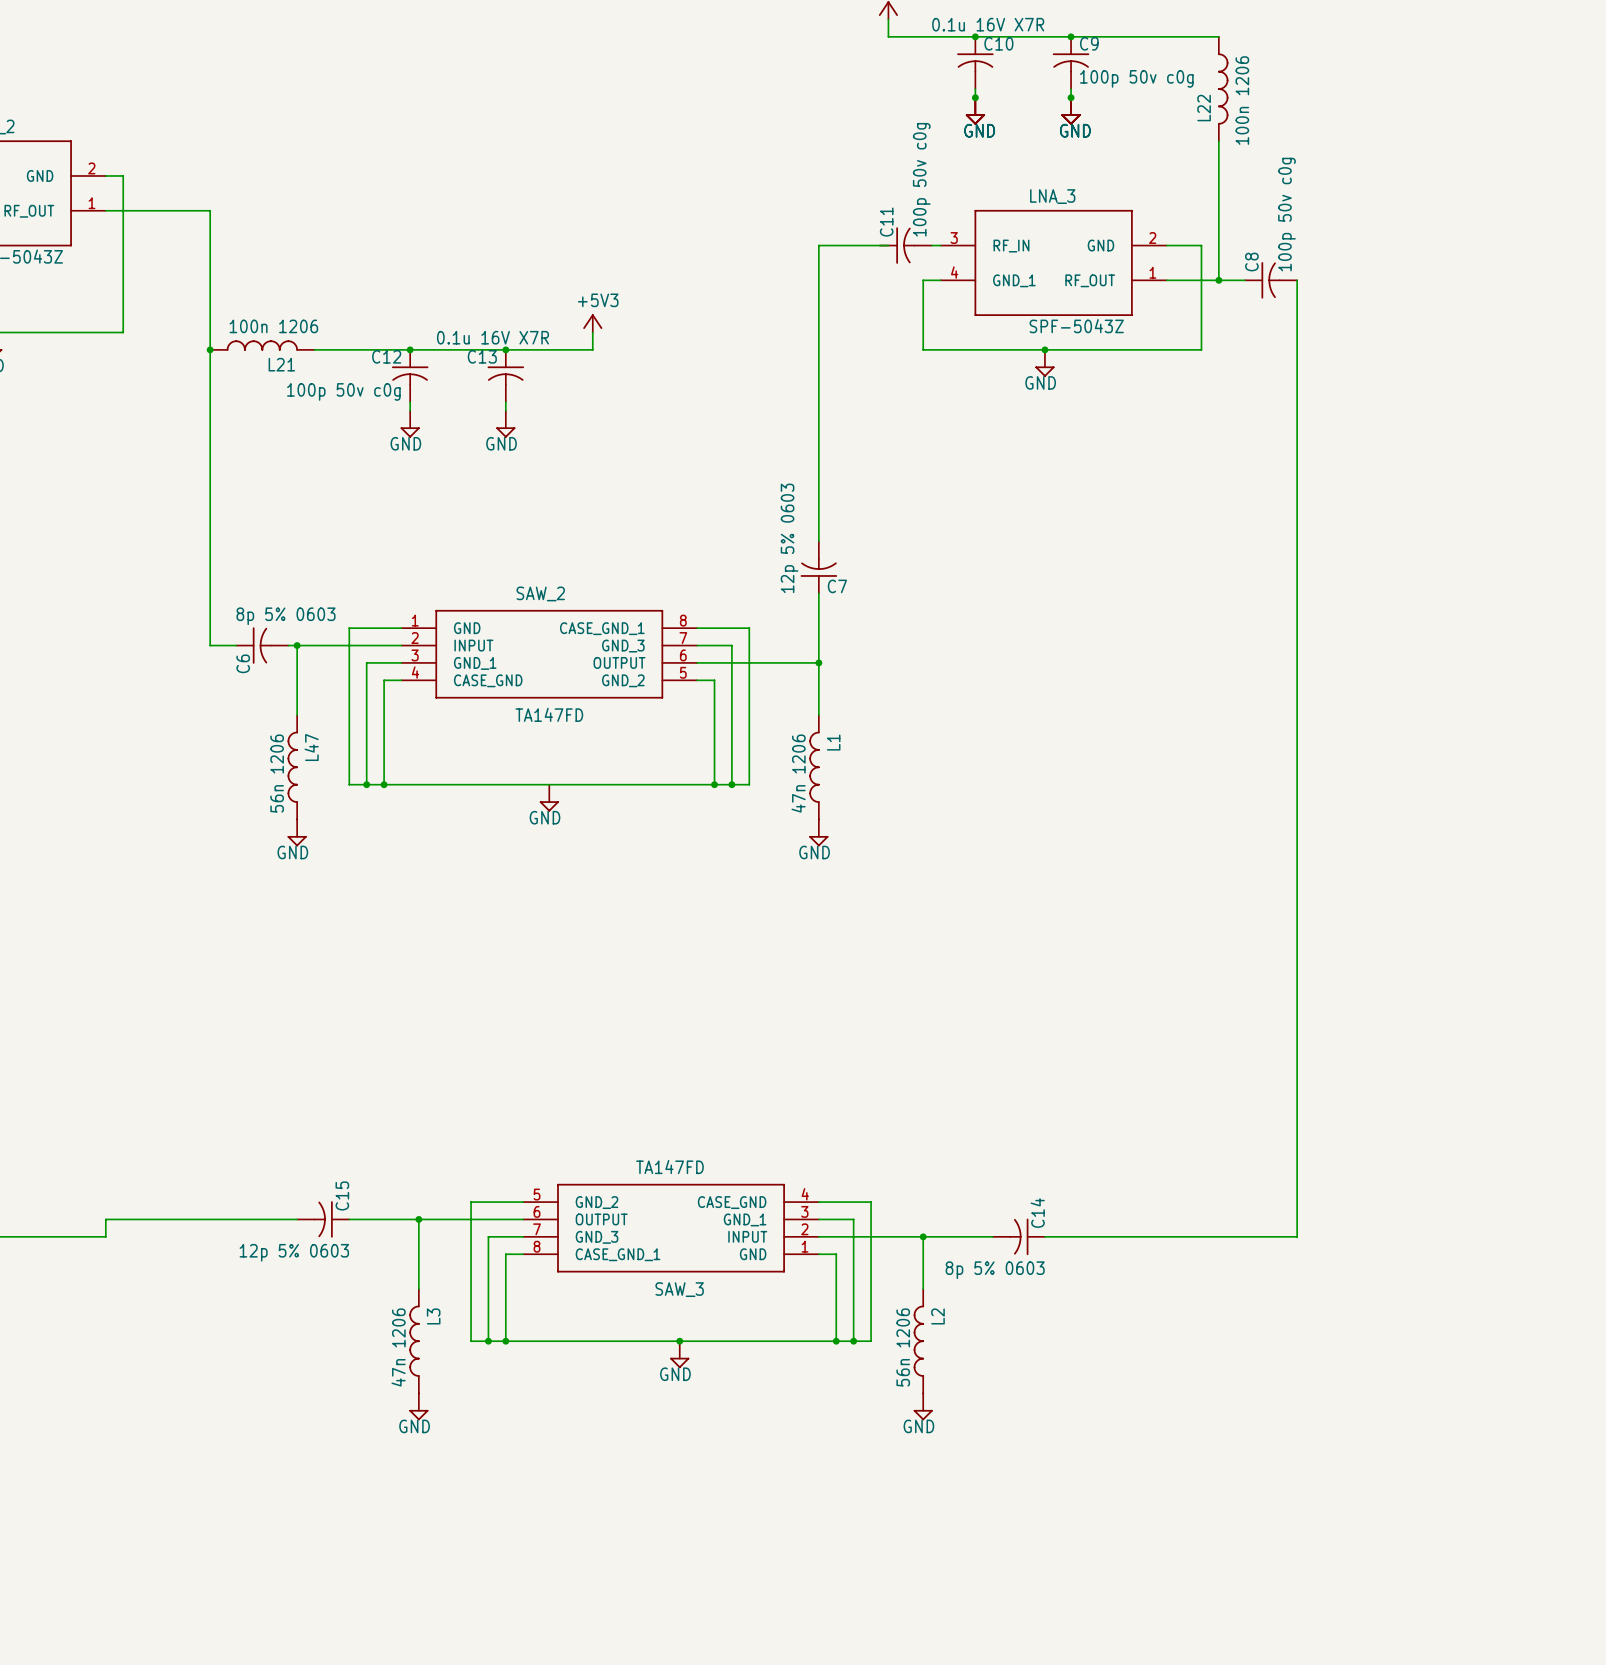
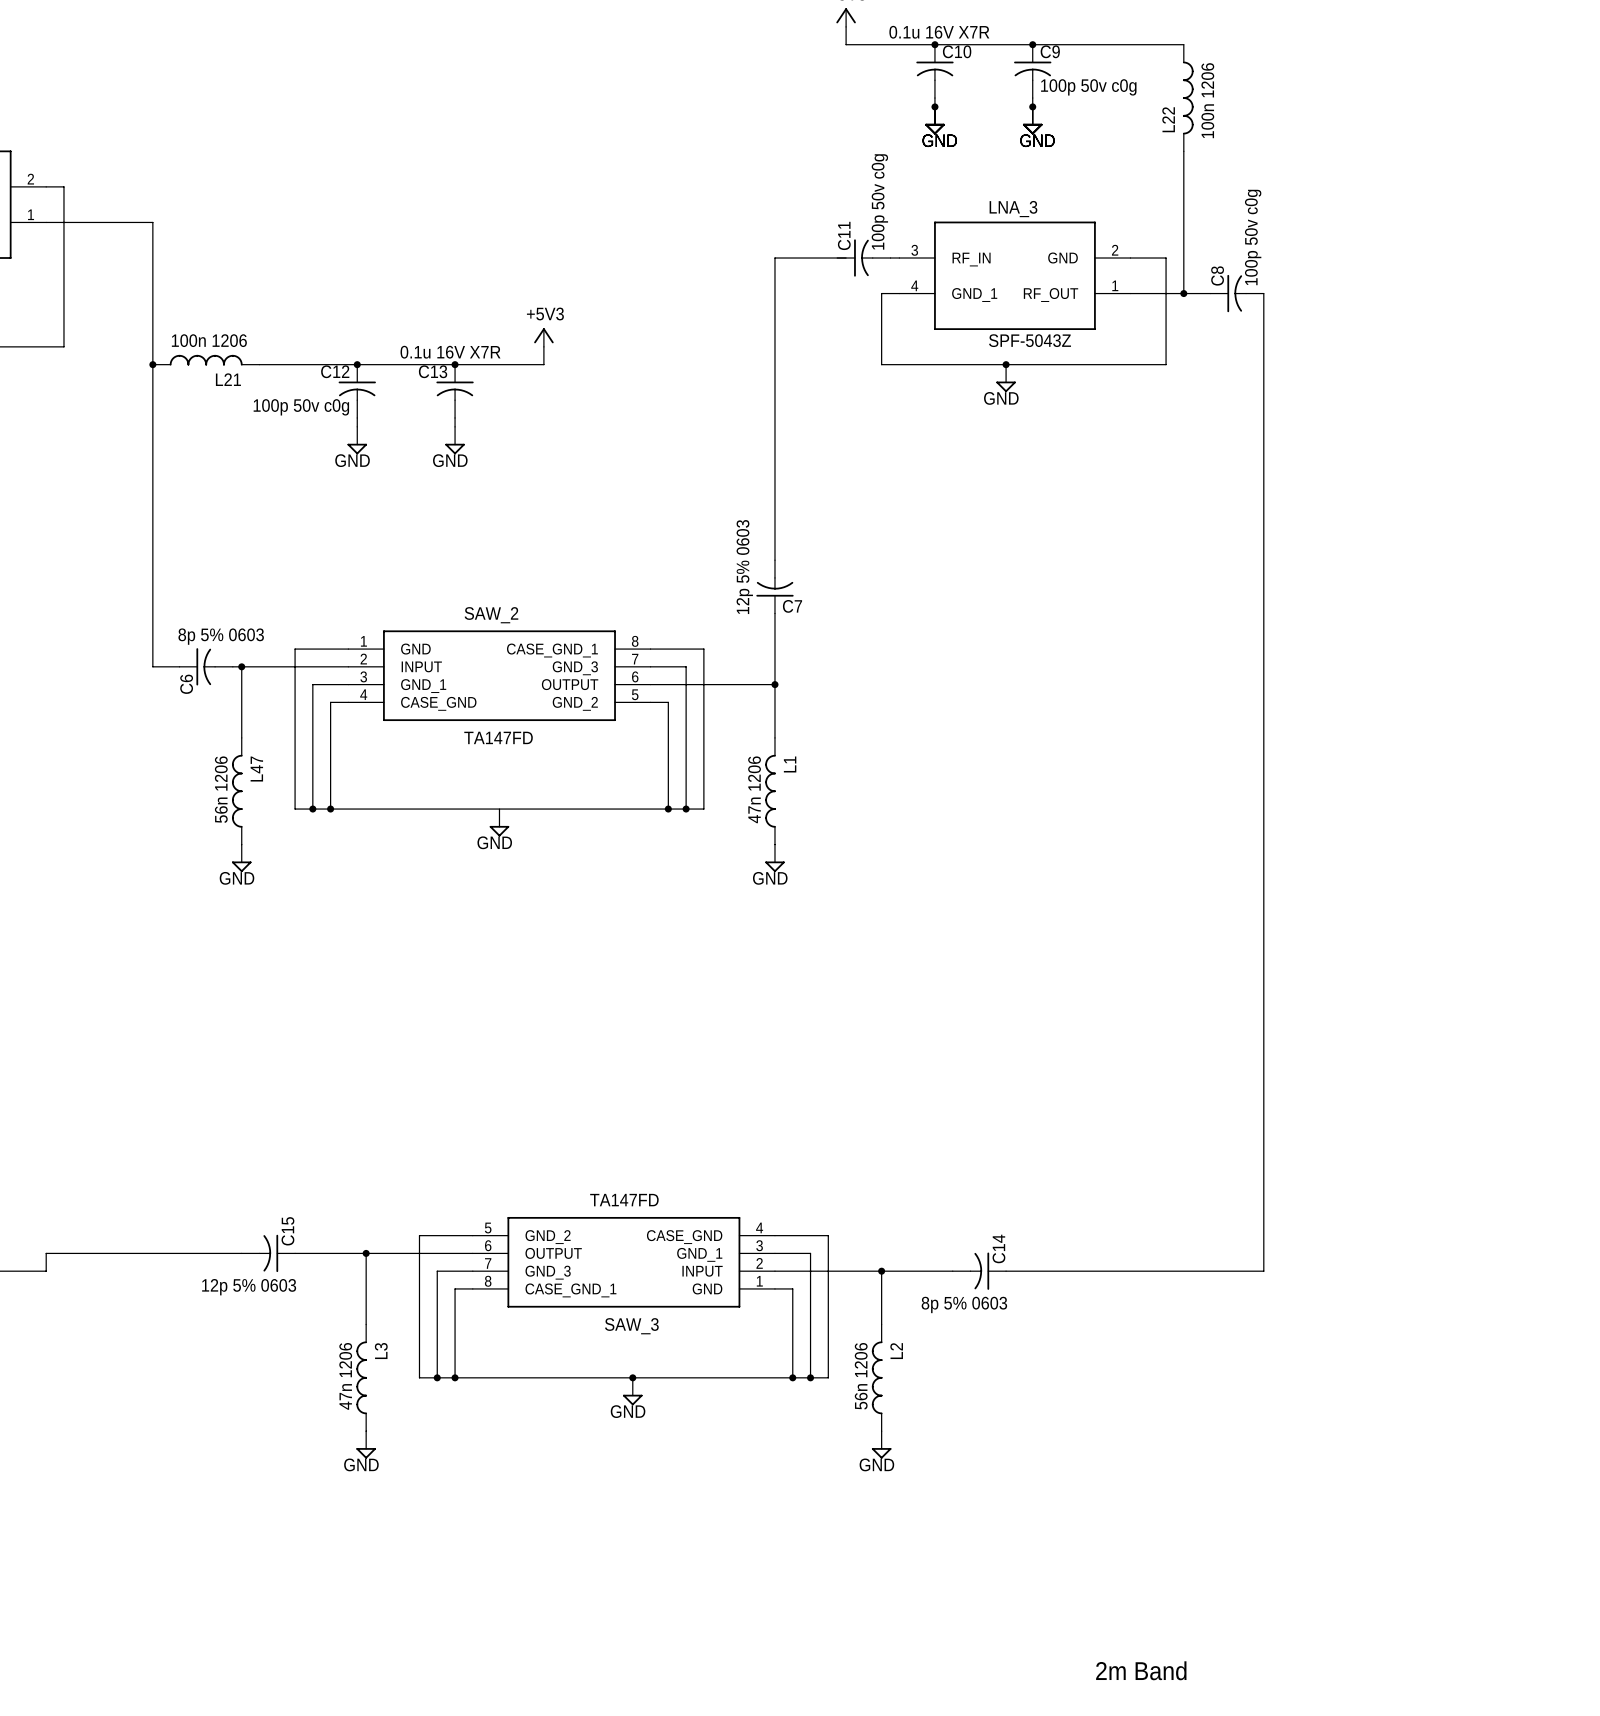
text: none -> 2m Band (1141, 1670)

